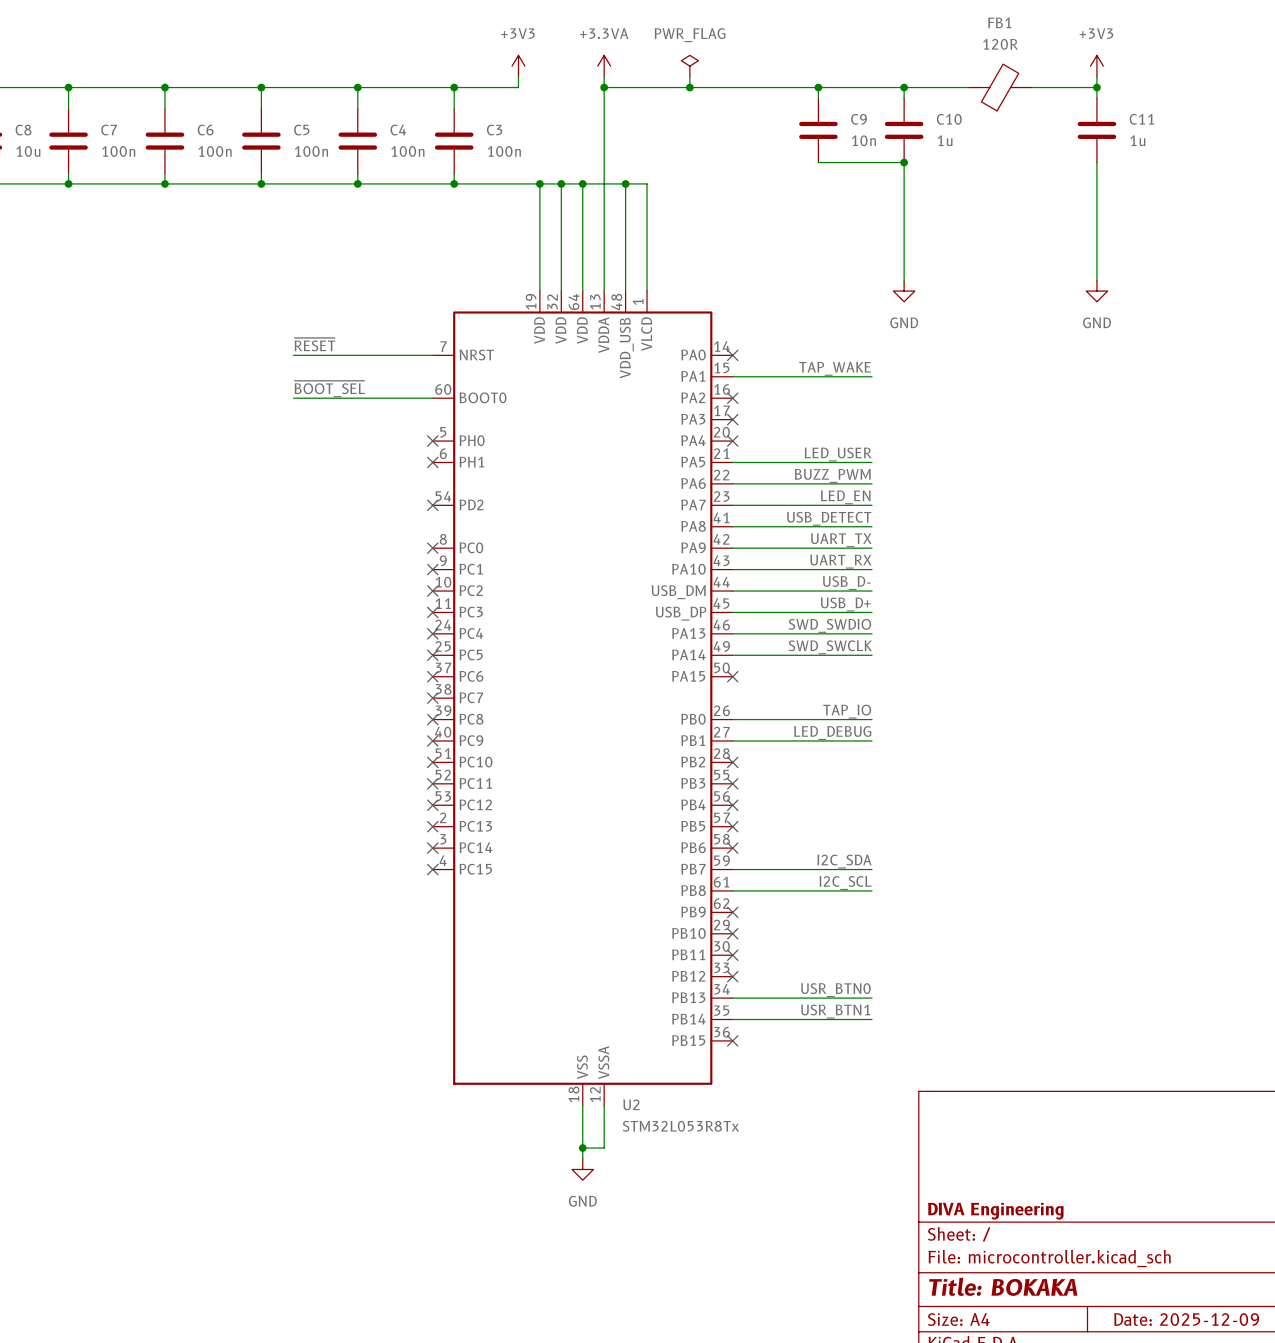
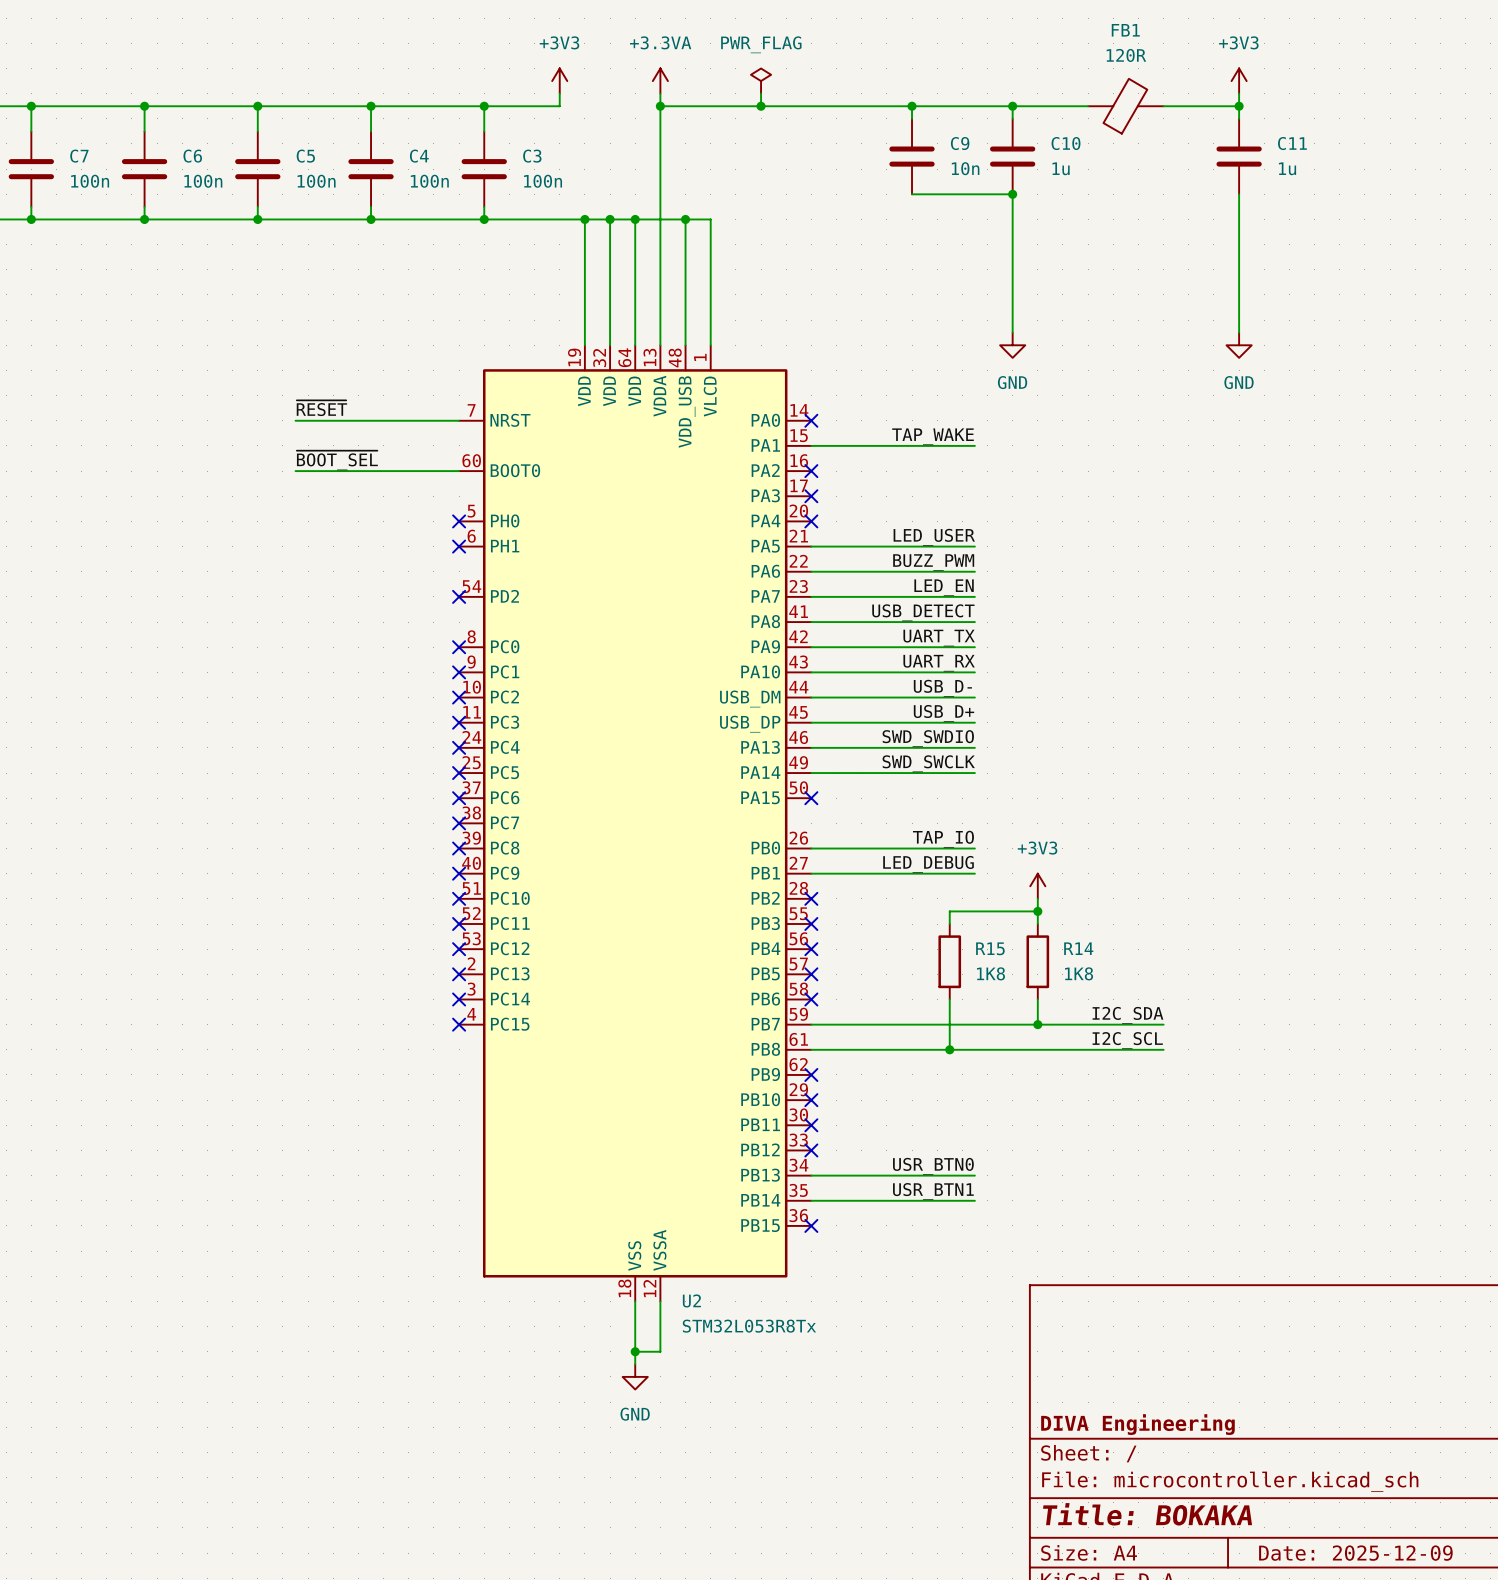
power symbol: none -> +3V3 (1037, 886)
wire: none -> (1037, 898) (1037, 924)
wire: none -> (1037, 911) (949, 911) (949, 924)
junction: none -> (1037, 911)
R15: none -> 1K8 (949, 961)
R14: none -> 1K8 (1037, 961)
wire: none -> (949, 999) (949, 1049)
wire: none -> (1037, 999) (1037, 1024)
label position: I2C_SDA (844, 861) -> I2C_SDA (1127, 1015)
wire: none -> (974, 1024) (1163, 1024)
junction: none -> (1037, 1024)
label position: I2C_SCL (845, 883) -> I2C_SCL (1127, 1040)
junction: none -> (949, 1049)
wire: none -> (974, 1049) (1163, 1049)

